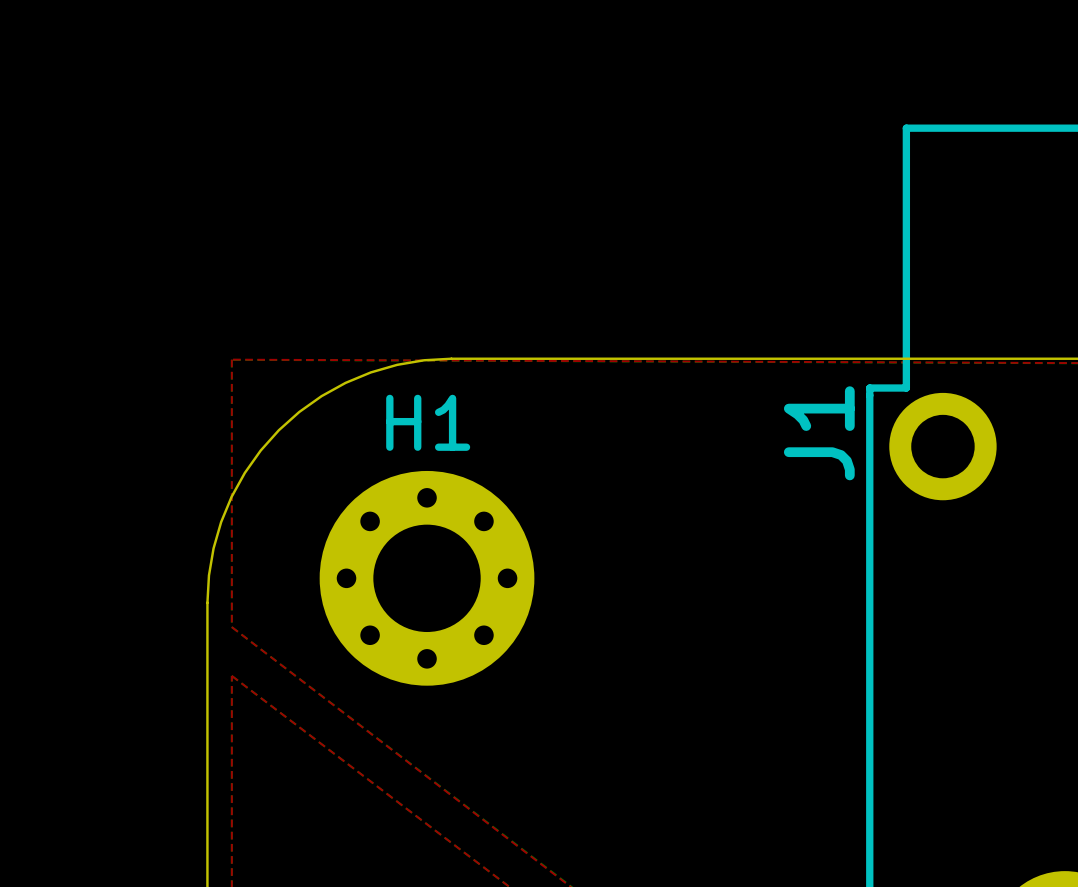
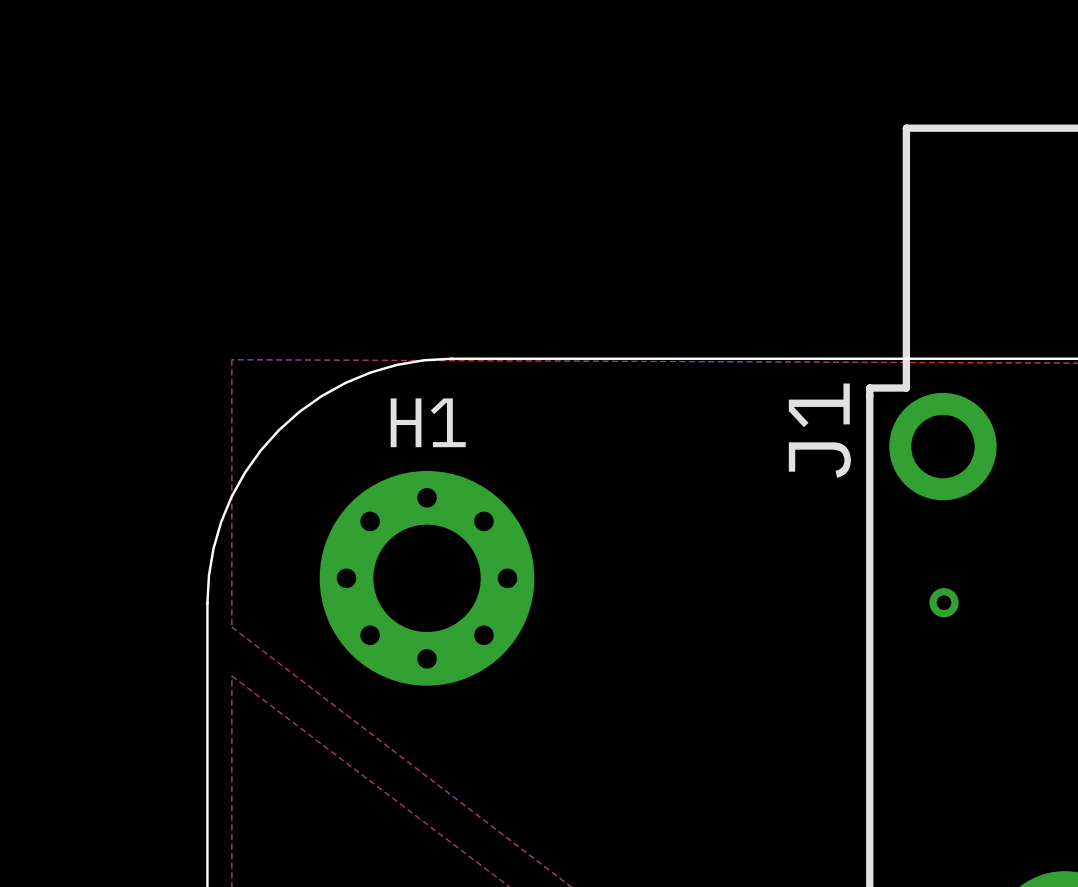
via: none -> (944, 602)

